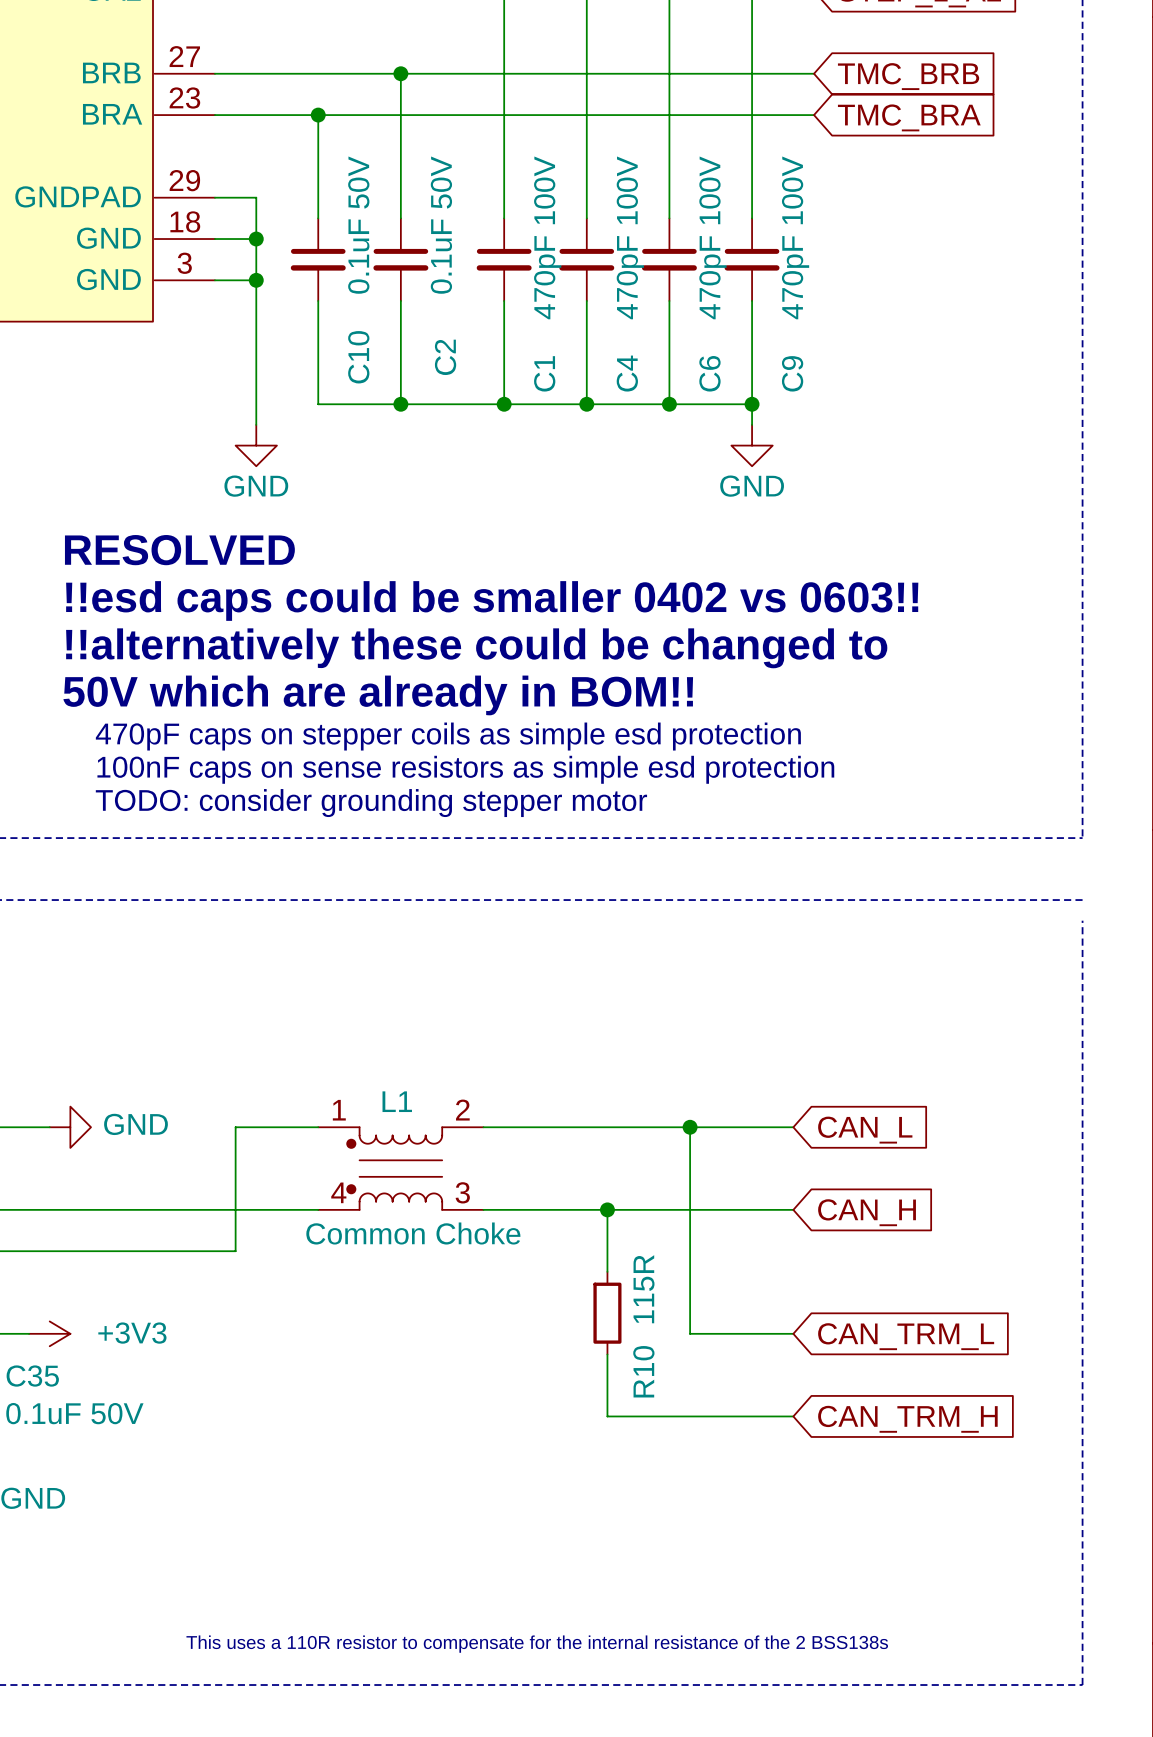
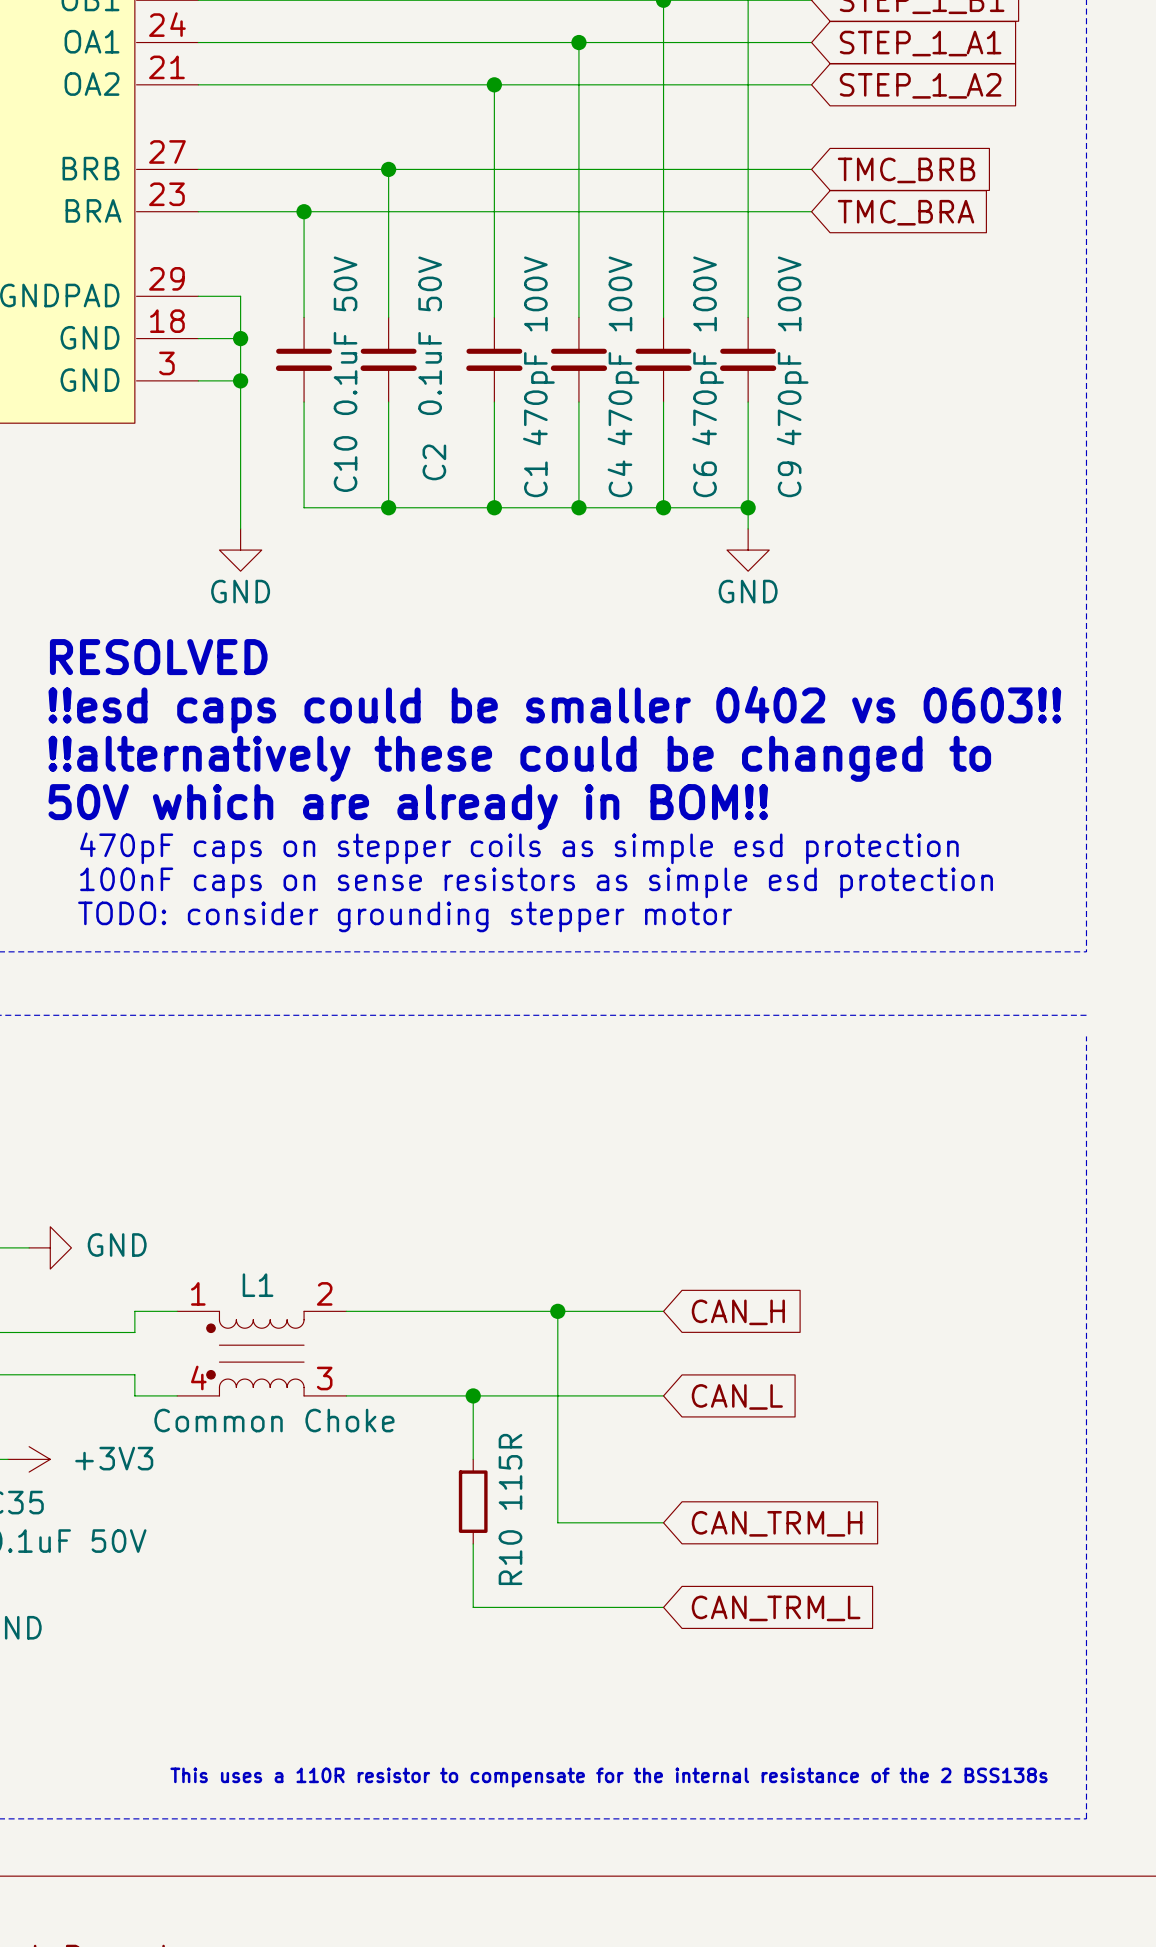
wire: (318, 1127) (235, 1127) (235, 1251) (153, 1251) -> (177, 1395) (134, 1395) (134, 1374)
wire: (483, 1127) (793, 1127) -> (346, 1311) (663, 1311)
wire: (690, 1127) (690, 1333) (793, 1333) -> (557, 1311) (557, 1522) (663, 1522)
junction: (690, 1127) -> none
global label position: CAN_L (865, 1130) -> CAN_L (737, 1396)
L1 position: (400, 1168) -> (261, 1353)
wire: (153, 1209) (318, 1209) -> (134, 1332) (134, 1311) (177, 1311)
wire: (483, 1209) (793, 1209) -> (346, 1395) (663, 1395)
wire: (607, 1209) (607, 1271) -> (473, 1395) (473, 1459)
junction position: (607, 1209) -> (557, 1311)
global label position: CAN_H (867, 1212) -> CAN_H (738, 1312)
junction: none -> (473, 1395)
R10 position: (607, 1313) -> (473, 1501)
global label position: CAN_TRM_L (906, 1336) -> CAN_TRM_L (776, 1608)
wire: (607, 1354) (607, 1416) (793, 1416) -> (473, 1543) (473, 1607) (663, 1607)
global label position: CAN_TRM_H (907, 1419) -> CAN_TRM_H (777, 1523)

